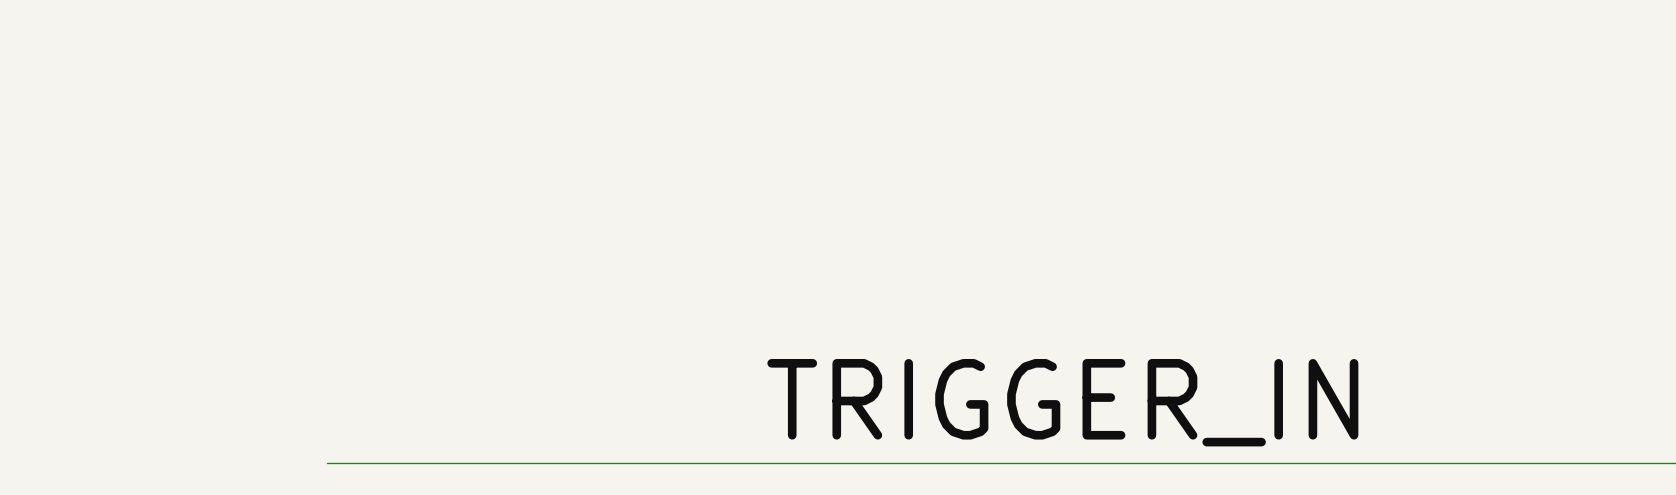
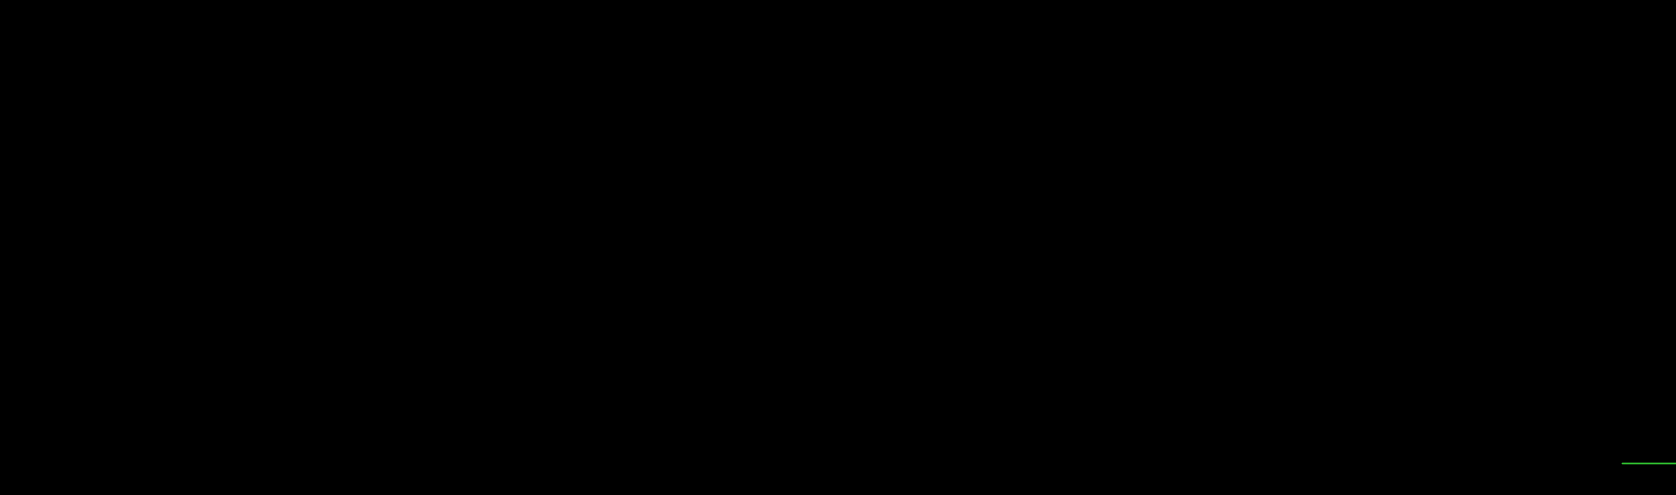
label: TRIGGER_IN (1062, 402) -> none
wire: (327, 463) (1622, 463) -> none

